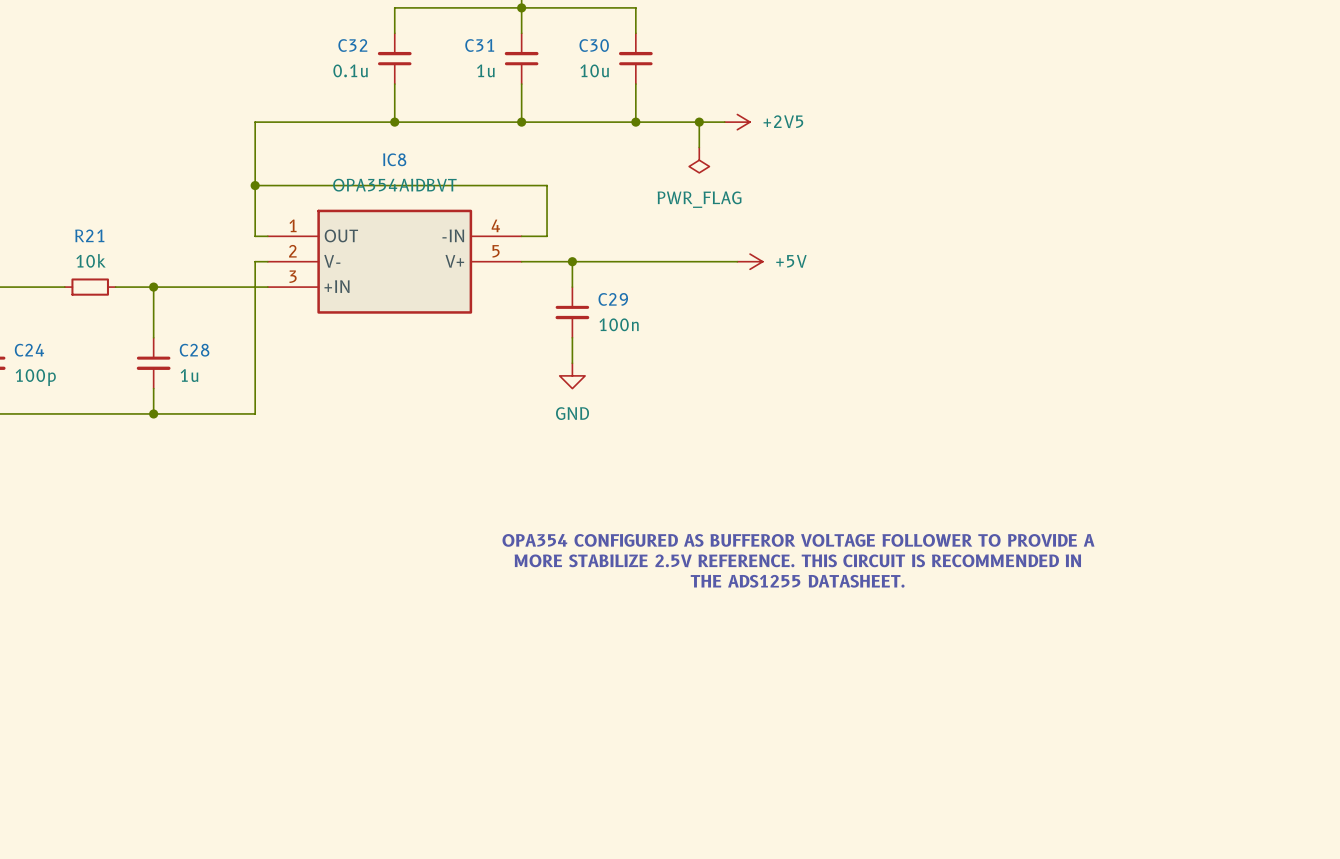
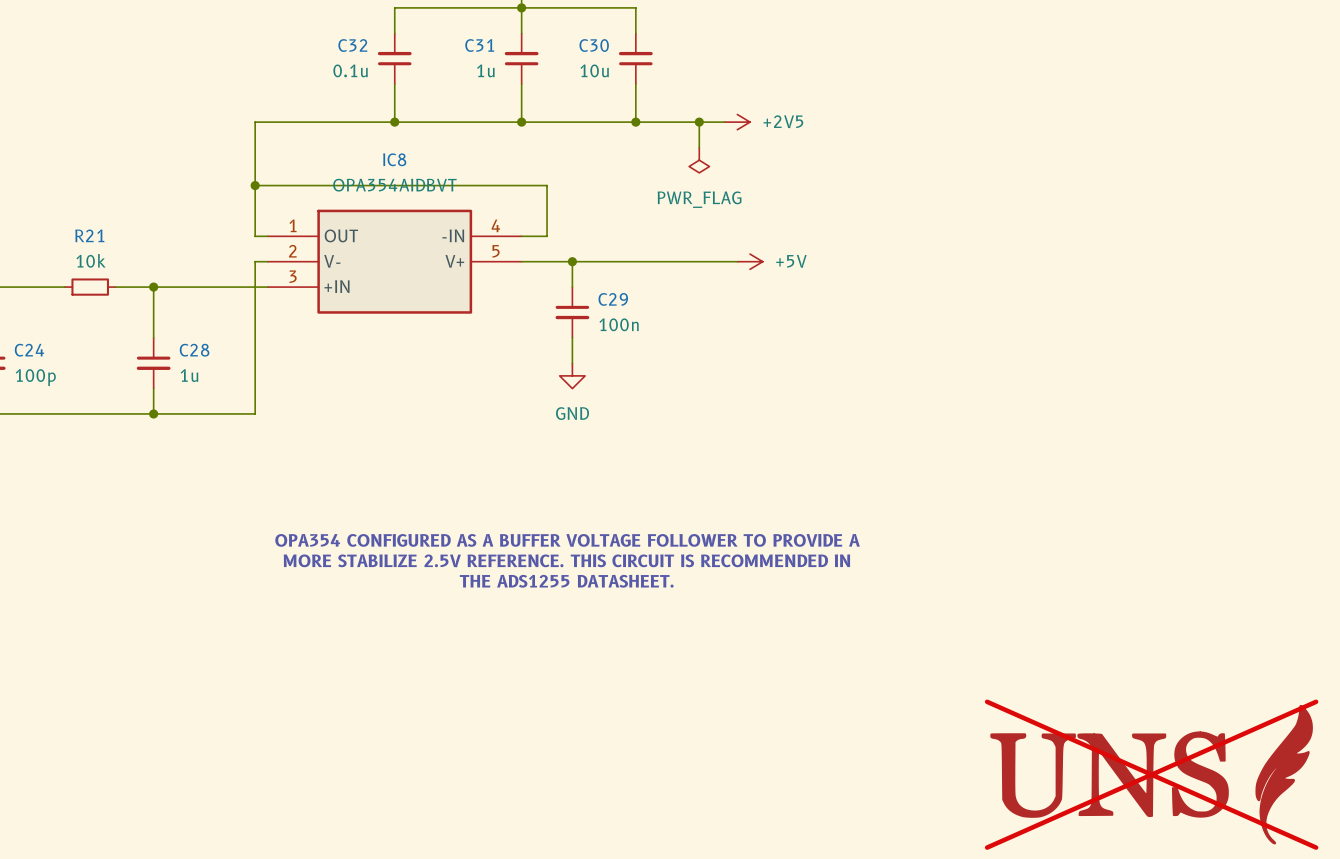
text: OPA354 CONFIGURED AS BUFFEROR VOLTAGE FOLLOWER TO PROVIDE A (798, 540) -> OPA354 CONFIGURED AS A BUFFER VOLTAGE FOLLOWER TO PROVIDE A (567, 540)
text position: MORE STABILIZE 2.5V REFERENCE. THIS CIRCUIT IS RECOMMENDED IN (797, 560) -> MORE STABILIZE 2.5V REFERENCE. THIS CIRCUIT IS RECOMMENDED IN (566, 560)
text position: THE ADS1255 DATASHEET. (797, 581) -> THE ADS1255 DATASHEET. (566, 581)
part: none -> (1151, 774)

